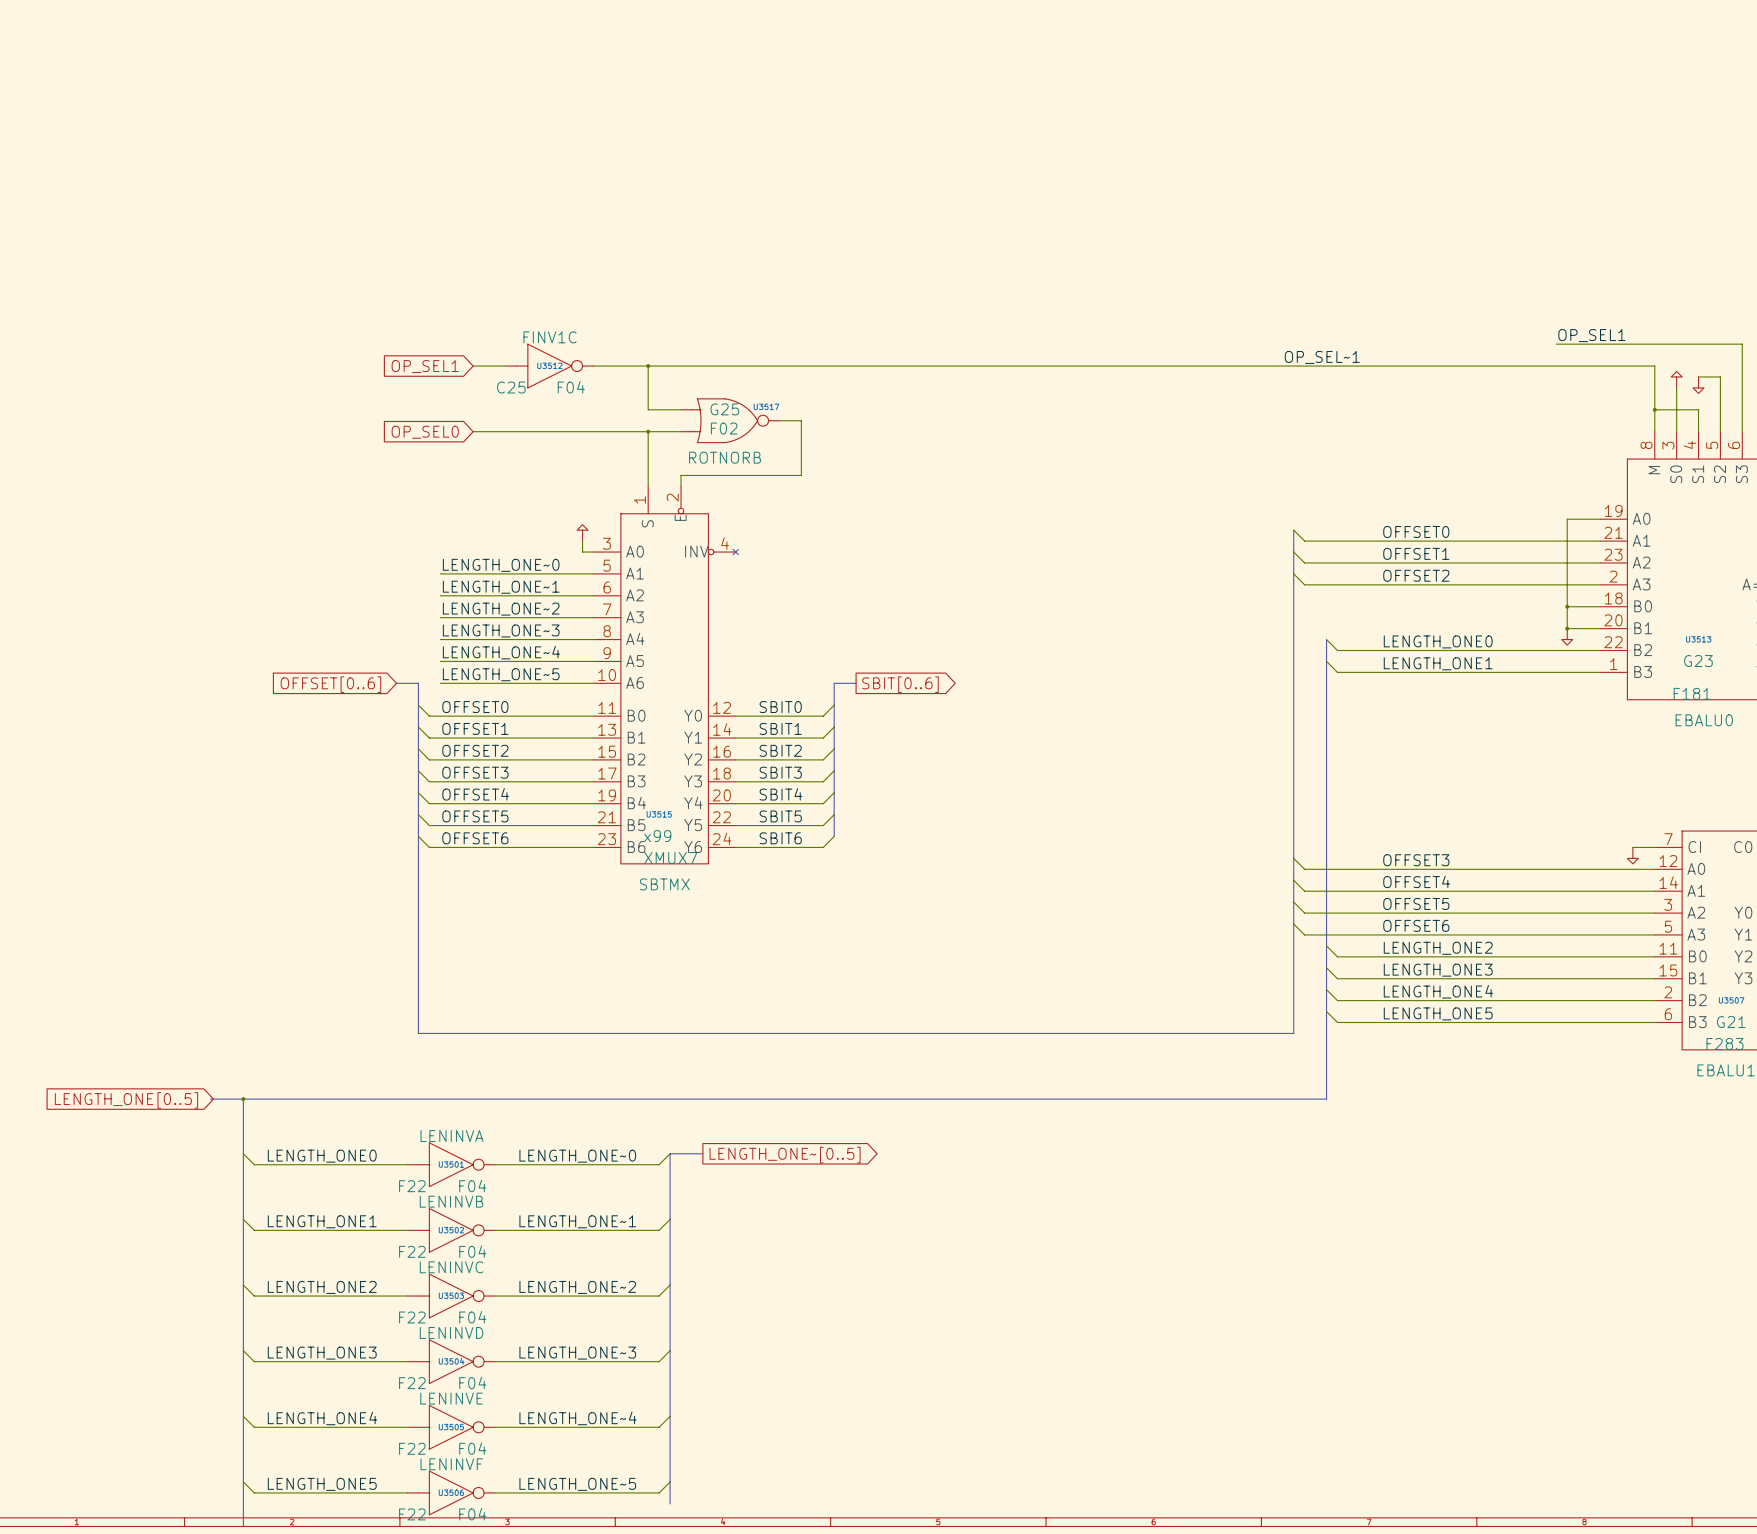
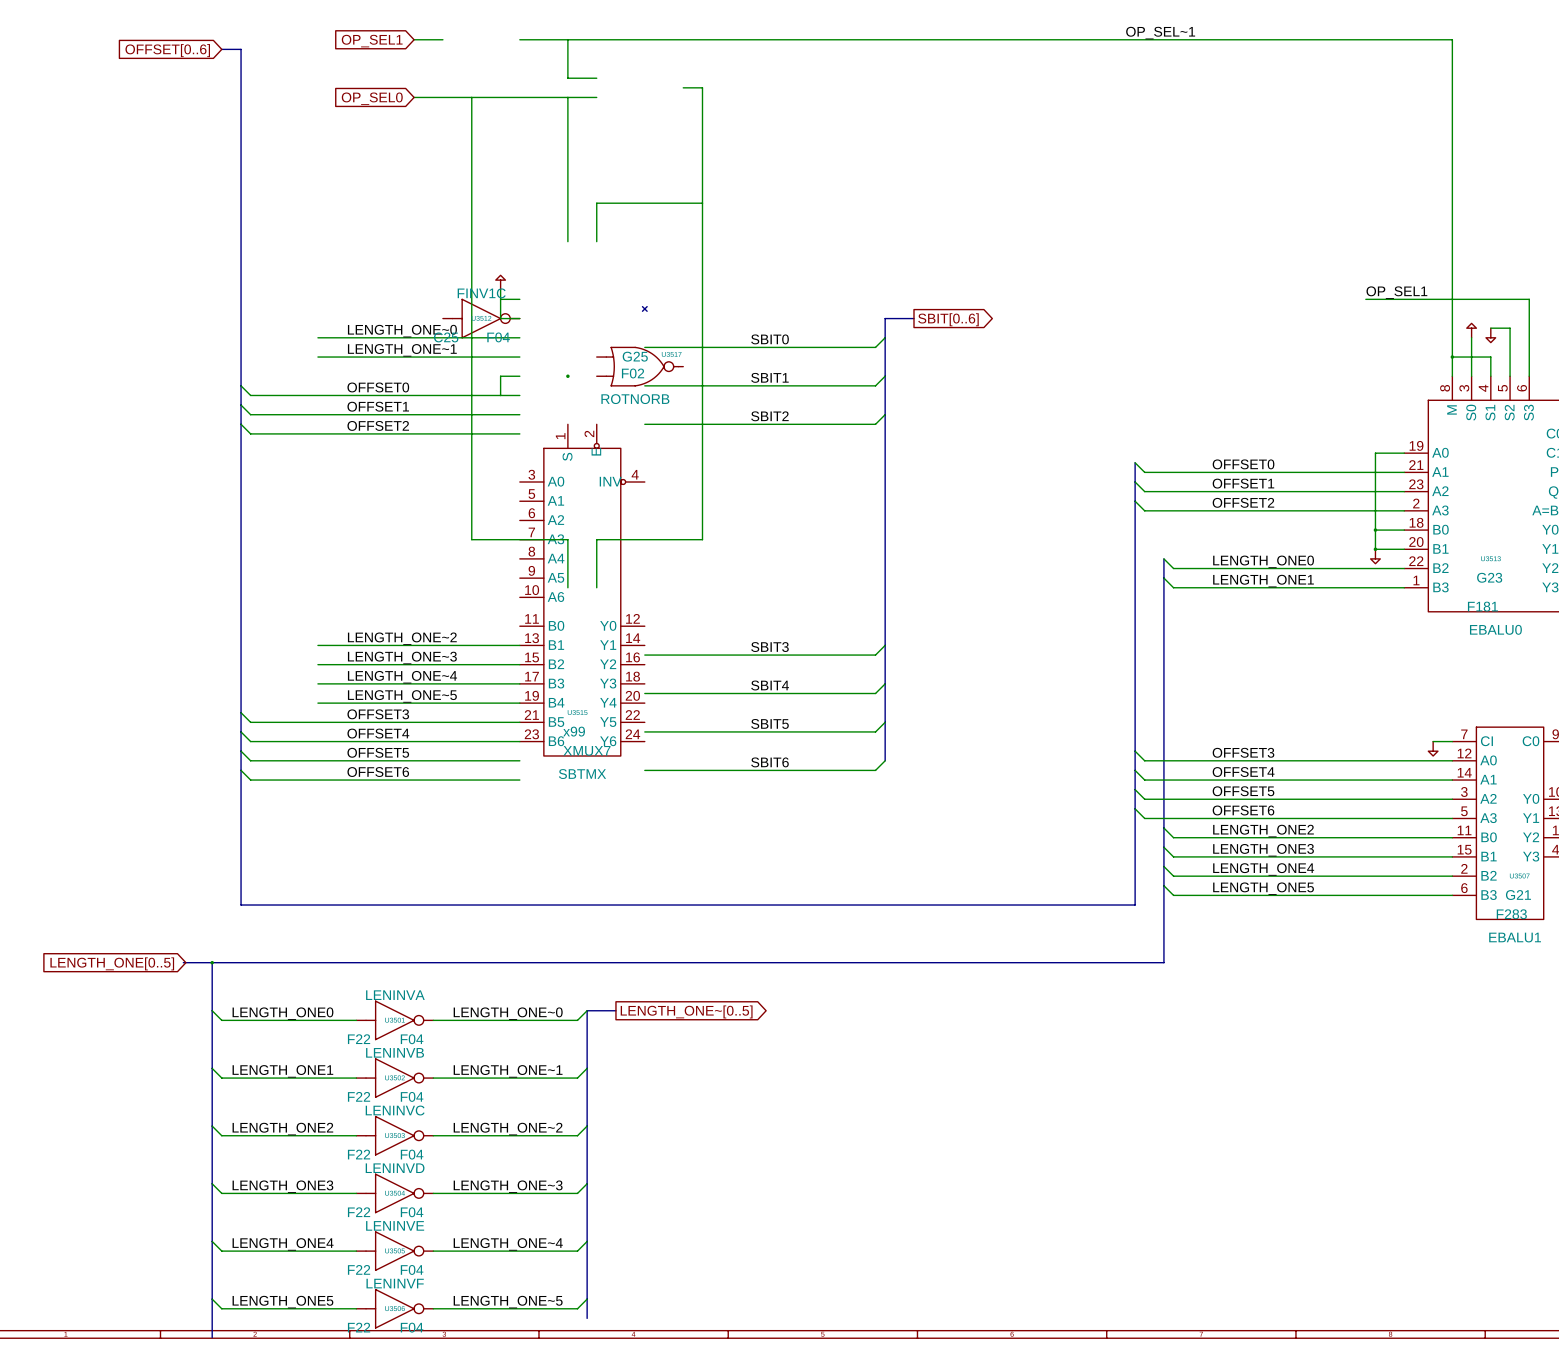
label: none -> OP_SEL~1 (1160, 33)
wire: none -> (414, 39) (442, 39)
wire: none -> (567, 39) (567, 78) (596, 78)
global label: none -> OP_SEL1 (372, 41)
global label: none -> OFFSET[0..6] (167, 50)
global label: none -> OP_SEL0 (372, 98)
wire: none -> (414, 97) (596, 97)
wire: none -> (567, 97) (567, 241)
wire: none -> (702, 203) (596, 203) (596, 241)
power symbol: none -> (500, 282)
wire: none -> (500, 289) (500, 318) (519, 318)
wire: none -> (500, 299) (519, 299)
no-connect mark: none -> (644, 308)
label: OP_SEL~1 (1322, 357) -> none
global label: OP_SEL1 (425, 366) -> none
wire: (473, 366) (505, 366) -> none
wire: (593, 366) (1654, 366) -> (519, 39) (1452, 39) (1452, 318)
wire: (648, 366) (648, 409) (681, 409) -> none
junction: (648, 366) -> none
bus: none -> (913, 318) (885, 318) (885, 760)
global label: none -> SBIT[0..6] (948, 319)
label: none -> LENGTH_ONE~0 (402, 331)
wire: none -> (317, 337) (519, 337)
wire: none -> (885, 337) (875, 347) (644, 347)
label: none -> SBIT0 (770, 339)
label: none -> LENGTH_ONE~1 (402, 350)
wire: none -> (317, 357) (519, 357)
wire: (779, 420) (801, 420) -> (683, 87) (702, 87) (702, 366)
wire: (473, 431) (571, 431) -> (500, 395) (500, 376)
wire: (593, 431) (681, 431) -> none
wire: (648, 431) (648, 486) -> none
wire: none -> (885, 376) (875, 385) (644, 385)
global label: OP_SEL0 (425, 432) -> none
label: none -> SBIT1 (769, 377)
wire: none -> (241, 385) (250, 395) (519, 395)
label: none -> OFFSET0 (378, 387)
wire: none -> (241, 405) (250, 414) (519, 414)
label: none -> OFFSET1 (378, 406)
wire: (801, 475) (681, 475) (681, 486) -> (702, 414) (702, 539) (596, 539) (596, 587)
wire: none -> (885, 414) (875, 424) (644, 424)
label: none -> SBIT2 (769, 416)
wire: none -> (241, 424) (250, 433) (519, 433)
label: none -> OFFSET2 (378, 425)
power symbol: (582, 532) -> none
wire: (582, 541) (582, 552) (593, 552) -> none
no-connect mark: (735, 552) -> none
label: LENGTH_ONE~0 (501, 565) -> none
wire: (440, 573) (593, 573) -> none
label: LENGTH_ONE~1 (501, 587) -> none
wire: (440, 595) (593, 595) -> none
label: LENGTH_ONE~2 (501, 609) -> none
wire: (440, 617) (538, 617) -> (471, 97) (471, 539)
wire: none -> (519, 539) (567, 539) (567, 587)
label: LENGTH_ONE~3 (501, 630) -> none
wire: (440, 639) (593, 639) -> none
label: LENGTH_ONE~4 (501, 652) -> none
wire: (440, 661) (593, 661) -> none
label: LENGTH_ONE~5 (501, 674) -> none
bus: (396, 683) (418, 683) (418, 1033) -> (221, 49) (241, 49) (241, 905) (366, 905)
wire: (440, 683) (593, 683) -> none
bus: (856, 683) (834, 683) (834, 836) -> none
global label: OFFSET[0..6] (330, 684) -> none
global label: SBIT[0..6] (900, 684) -> none
wire: (418, 705) (429, 716) (593, 716) -> none
wire: (834, 705) (823, 716) (735, 716) -> none
label: OFFSET0 (475, 707) -> none
label: SBIT0 (780, 707) -> none
wire: (418, 727) (429, 738) -> (317, 645) (375, 645)
wire: (834, 727) (823, 738) (735, 738) -> none
label: OFFSET1 (475, 728) -> none
label: SBIT1 (780, 728) -> none
label: none -> LENGTH_ONE~2 (402, 638)
wire: none -> (885, 645) (875, 655) (644, 655)
wire: (418, 748) (429, 759) -> (317, 664) (375, 664)
wire: (834, 748) (823, 759) (735, 759) -> none
label: OFFSET2 (475, 750) -> none
label: SBIT2 (780, 750) -> none
label: none -> LENGTH_ONE~3 (402, 657)
wire: (418, 770) (429, 781) -> (317, 683) (375, 683)
wire: (834, 770) (823, 781) (735, 781) -> none
label: none -> LENGTH_ONE~4 (402, 677)
label position: OFFSET3 (475, 772) -> OFFSET3 (378, 714)
label position: SBIT3 (780, 772) -> SBIT3 (769, 647)
wire: none -> (885, 683) (875, 693) (644, 693)
wire: (418, 792) (429, 803) -> (317, 703) (375, 703)
wire: (834, 792) (823, 803) (735, 803) -> none
label position: OFFSET4 (475, 794) -> OFFSET4 (378, 733)
label position: SBIT4 (780, 794) -> SBIT4 (770, 685)
label: none -> LENGTH_ONE~5 (402, 696)
wire: (418, 814) (429, 825) -> (241, 712) (250, 722) (375, 722)
wire: (834, 814) (823, 825) (735, 825) -> none
label position: OFFSET5 (475, 816) -> OFFSET5 (378, 752)
label position: SBIT5 (780, 816) -> SBIT5 (770, 723)
wire: none -> (885, 722) (875, 731) (644, 731)
wire: (418, 836) (429, 847) -> (241, 731) (250, 741) (375, 741)
wire: (834, 836) (823, 847) (735, 847) -> none
label position: OFFSET6 (475, 838) -> OFFSET6 (378, 772)
label position: SBIT6 (780, 838) -> SBIT6 (769, 762)
wire: none -> (241, 751) (250, 760) (519, 760)
wire: none -> (885, 760) (875, 770) (644, 770)
wire: none -> (241, 770) (250, 780) (519, 780)

